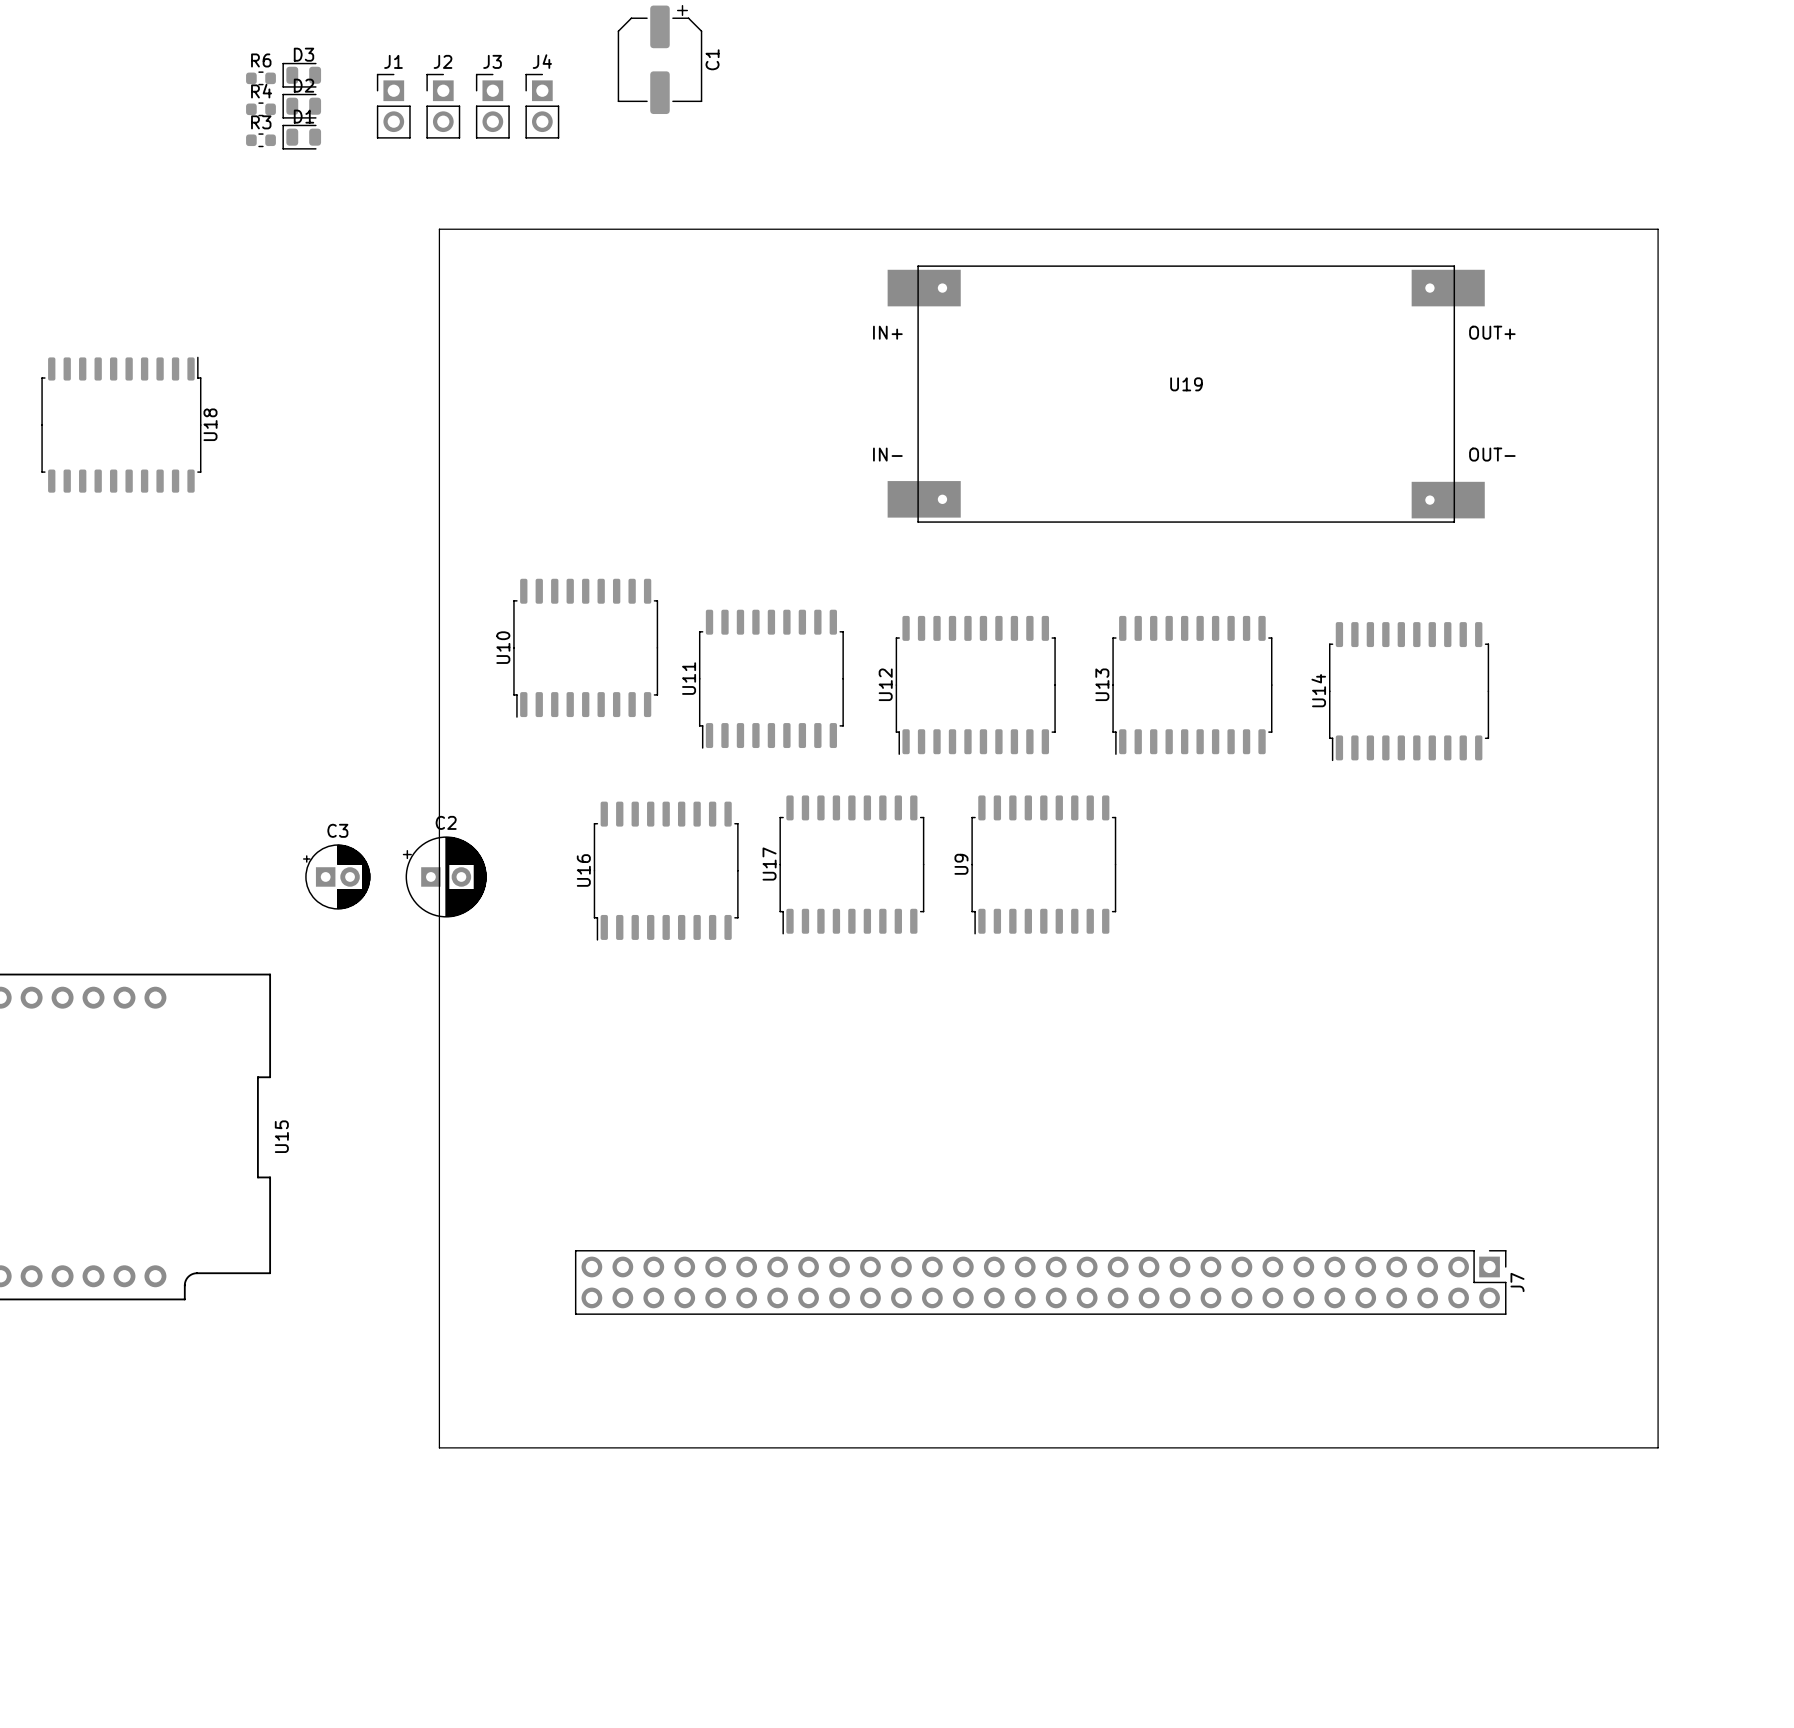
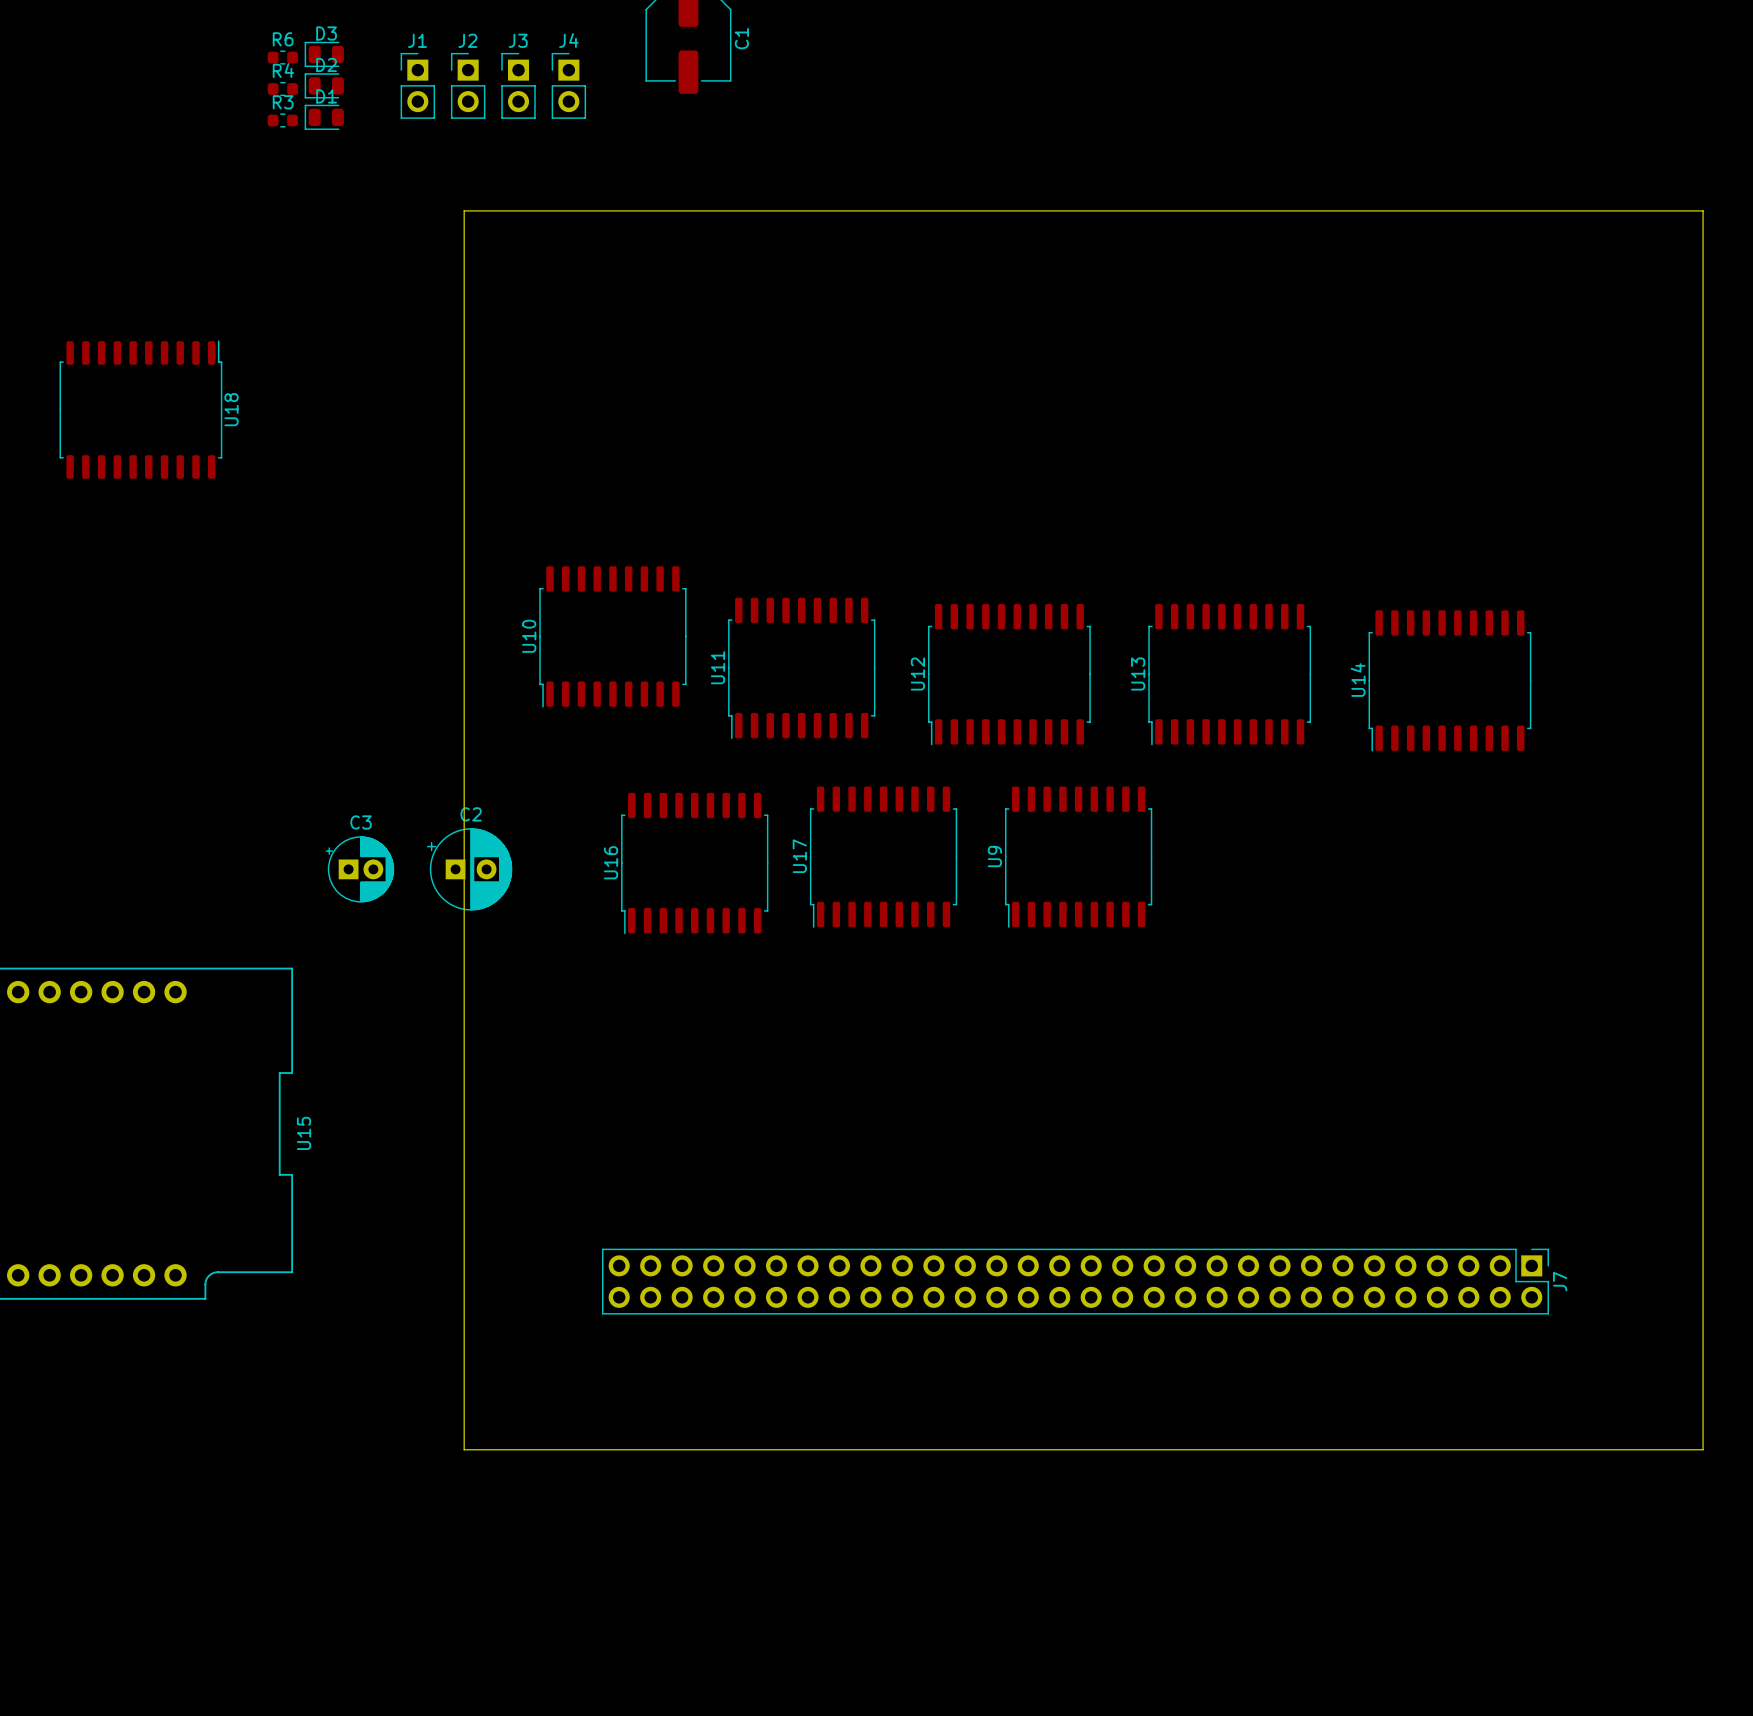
U19: (1186, 394) -> none

